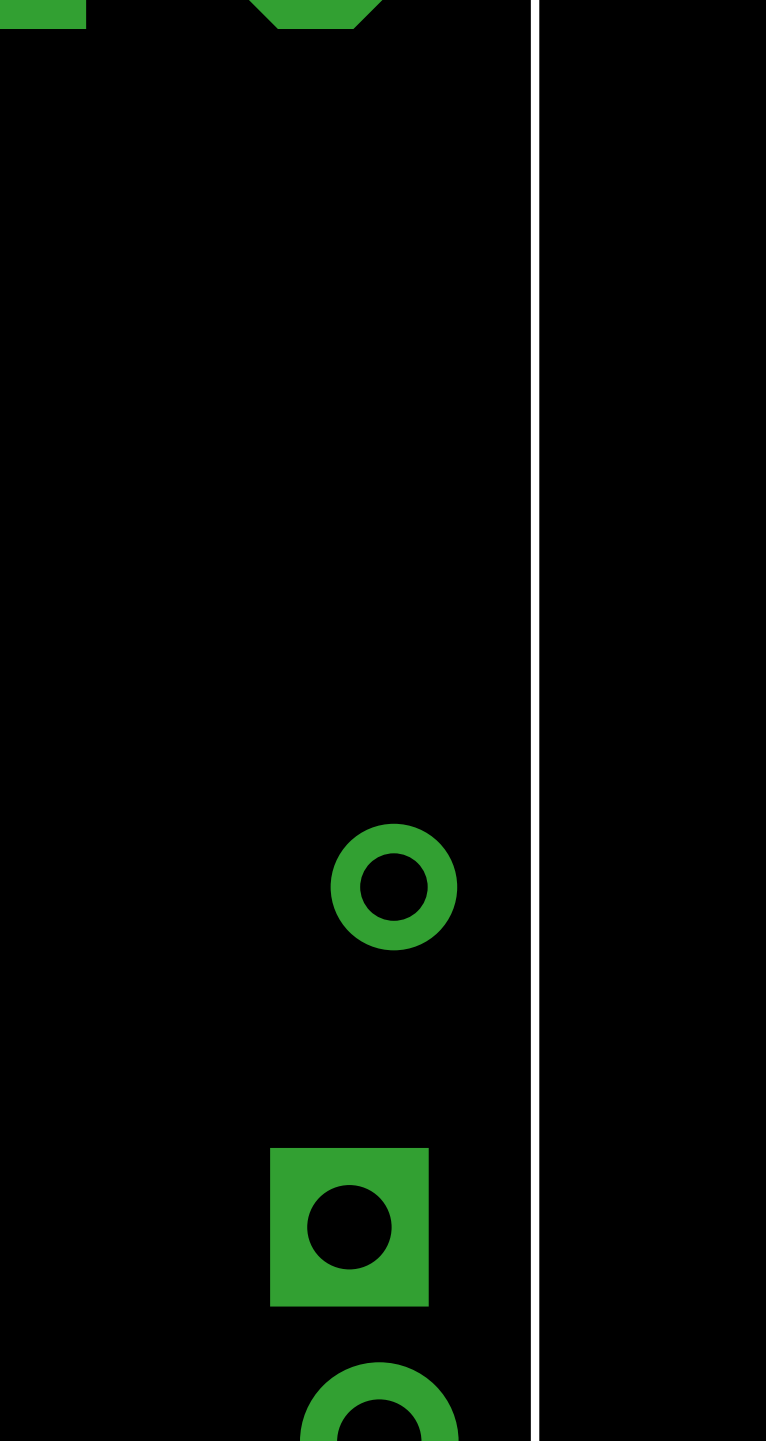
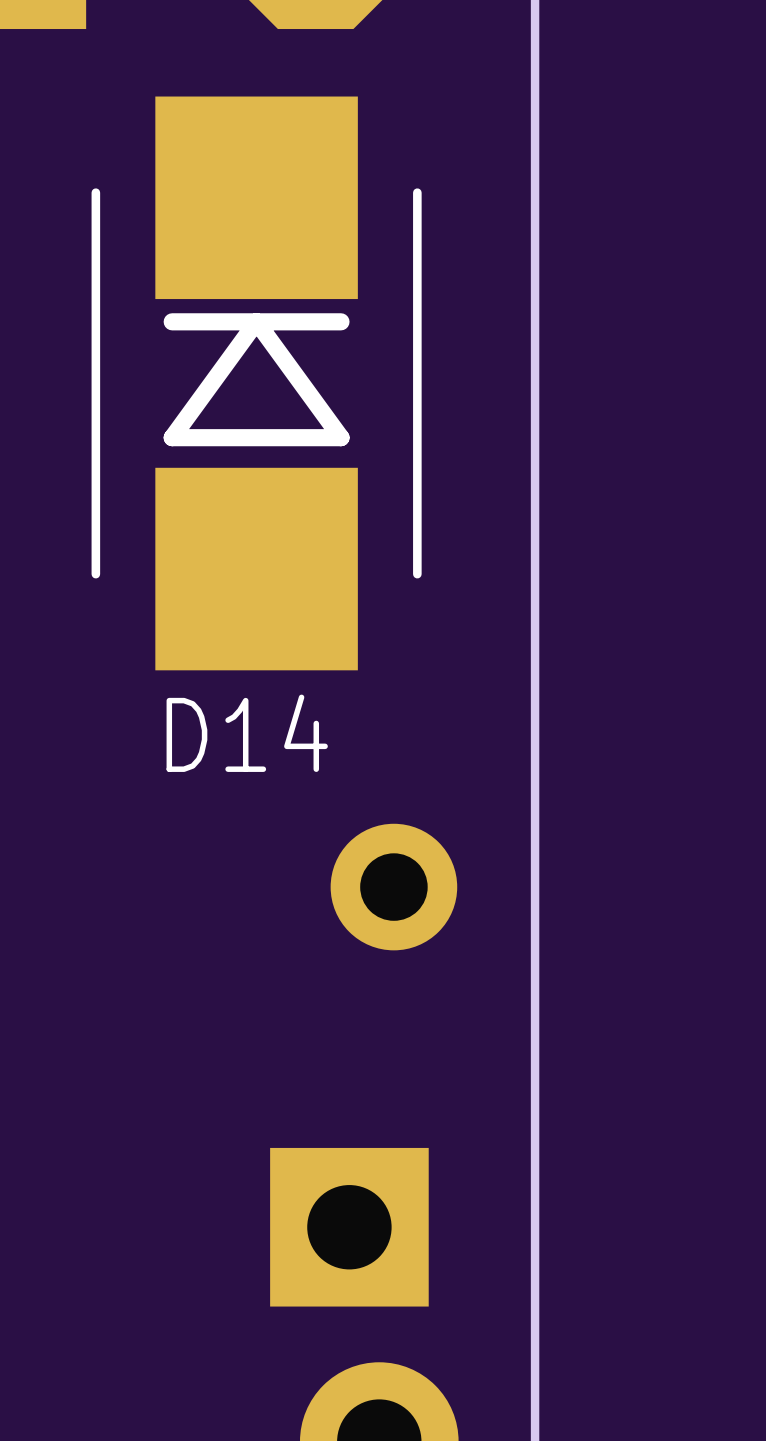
D14: none -> (256, 383)

